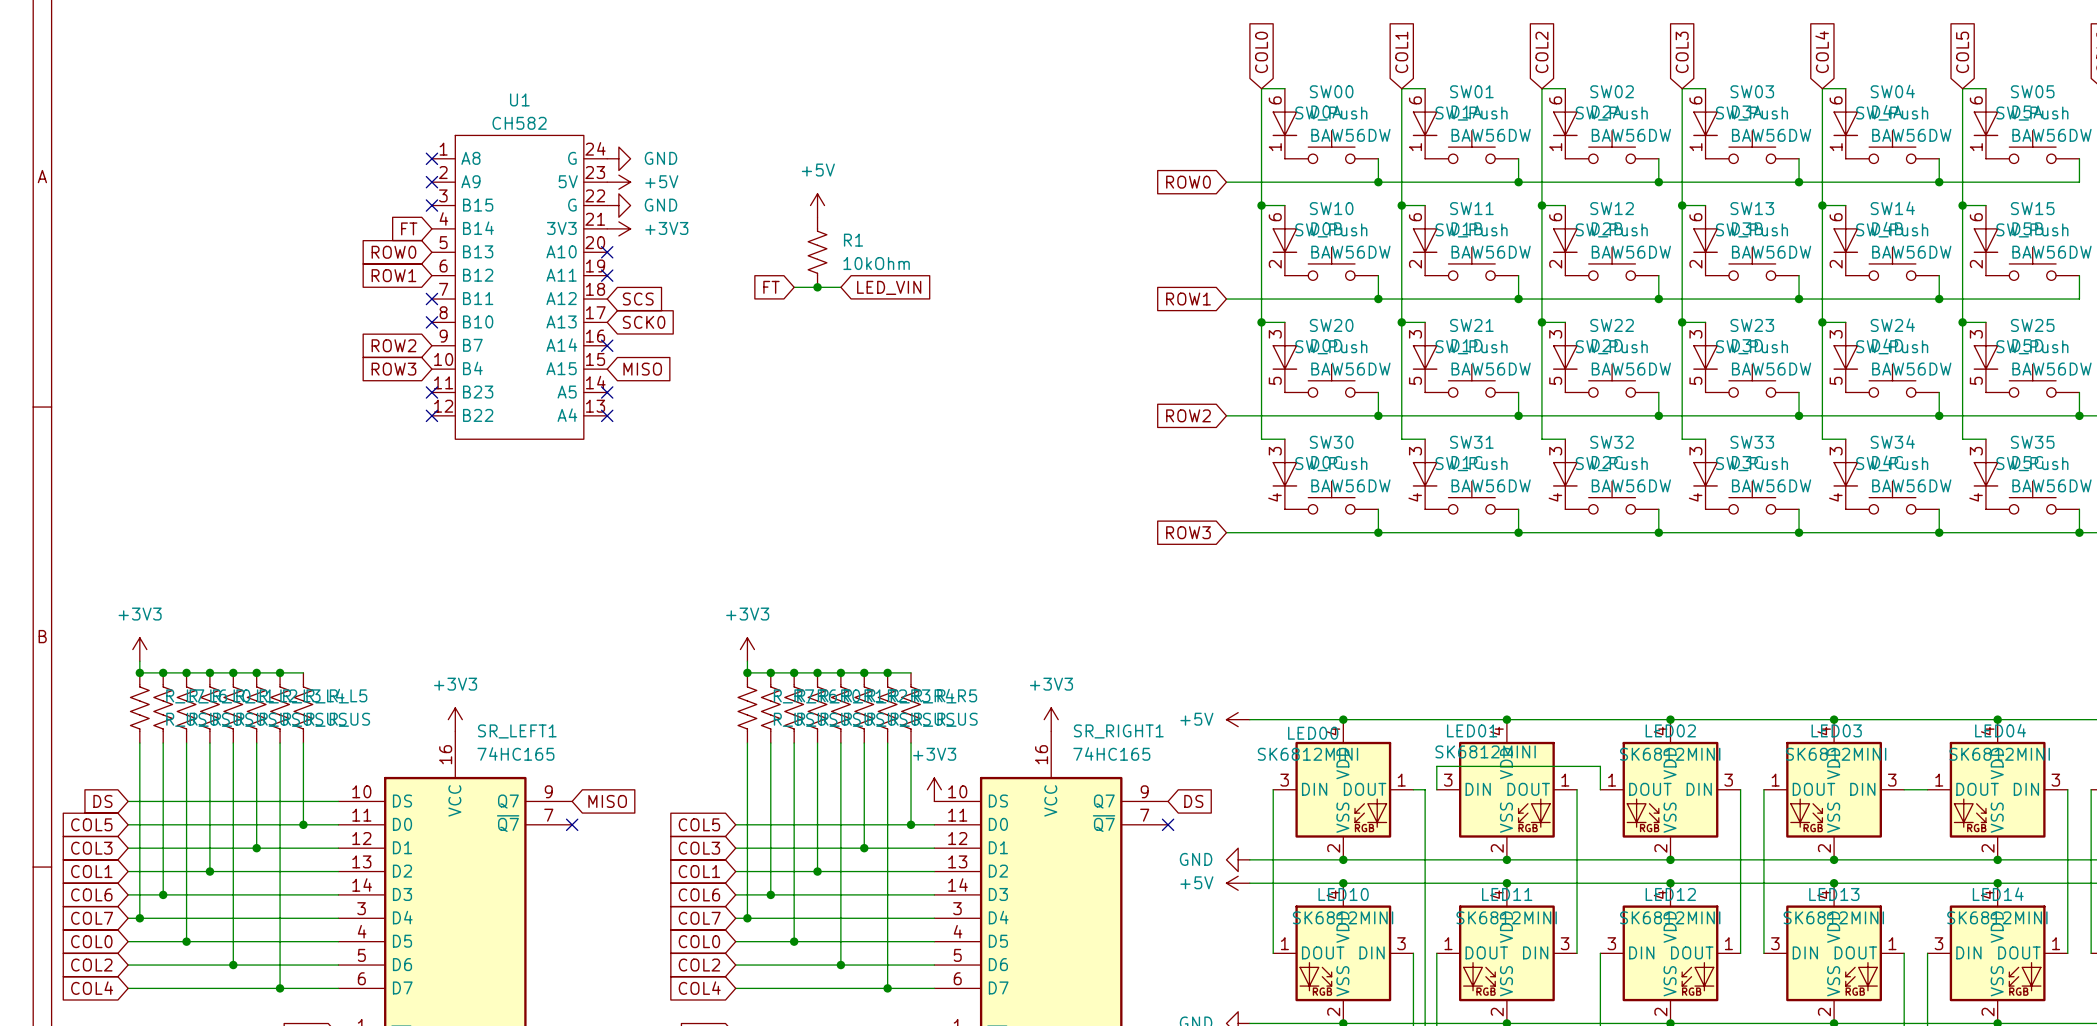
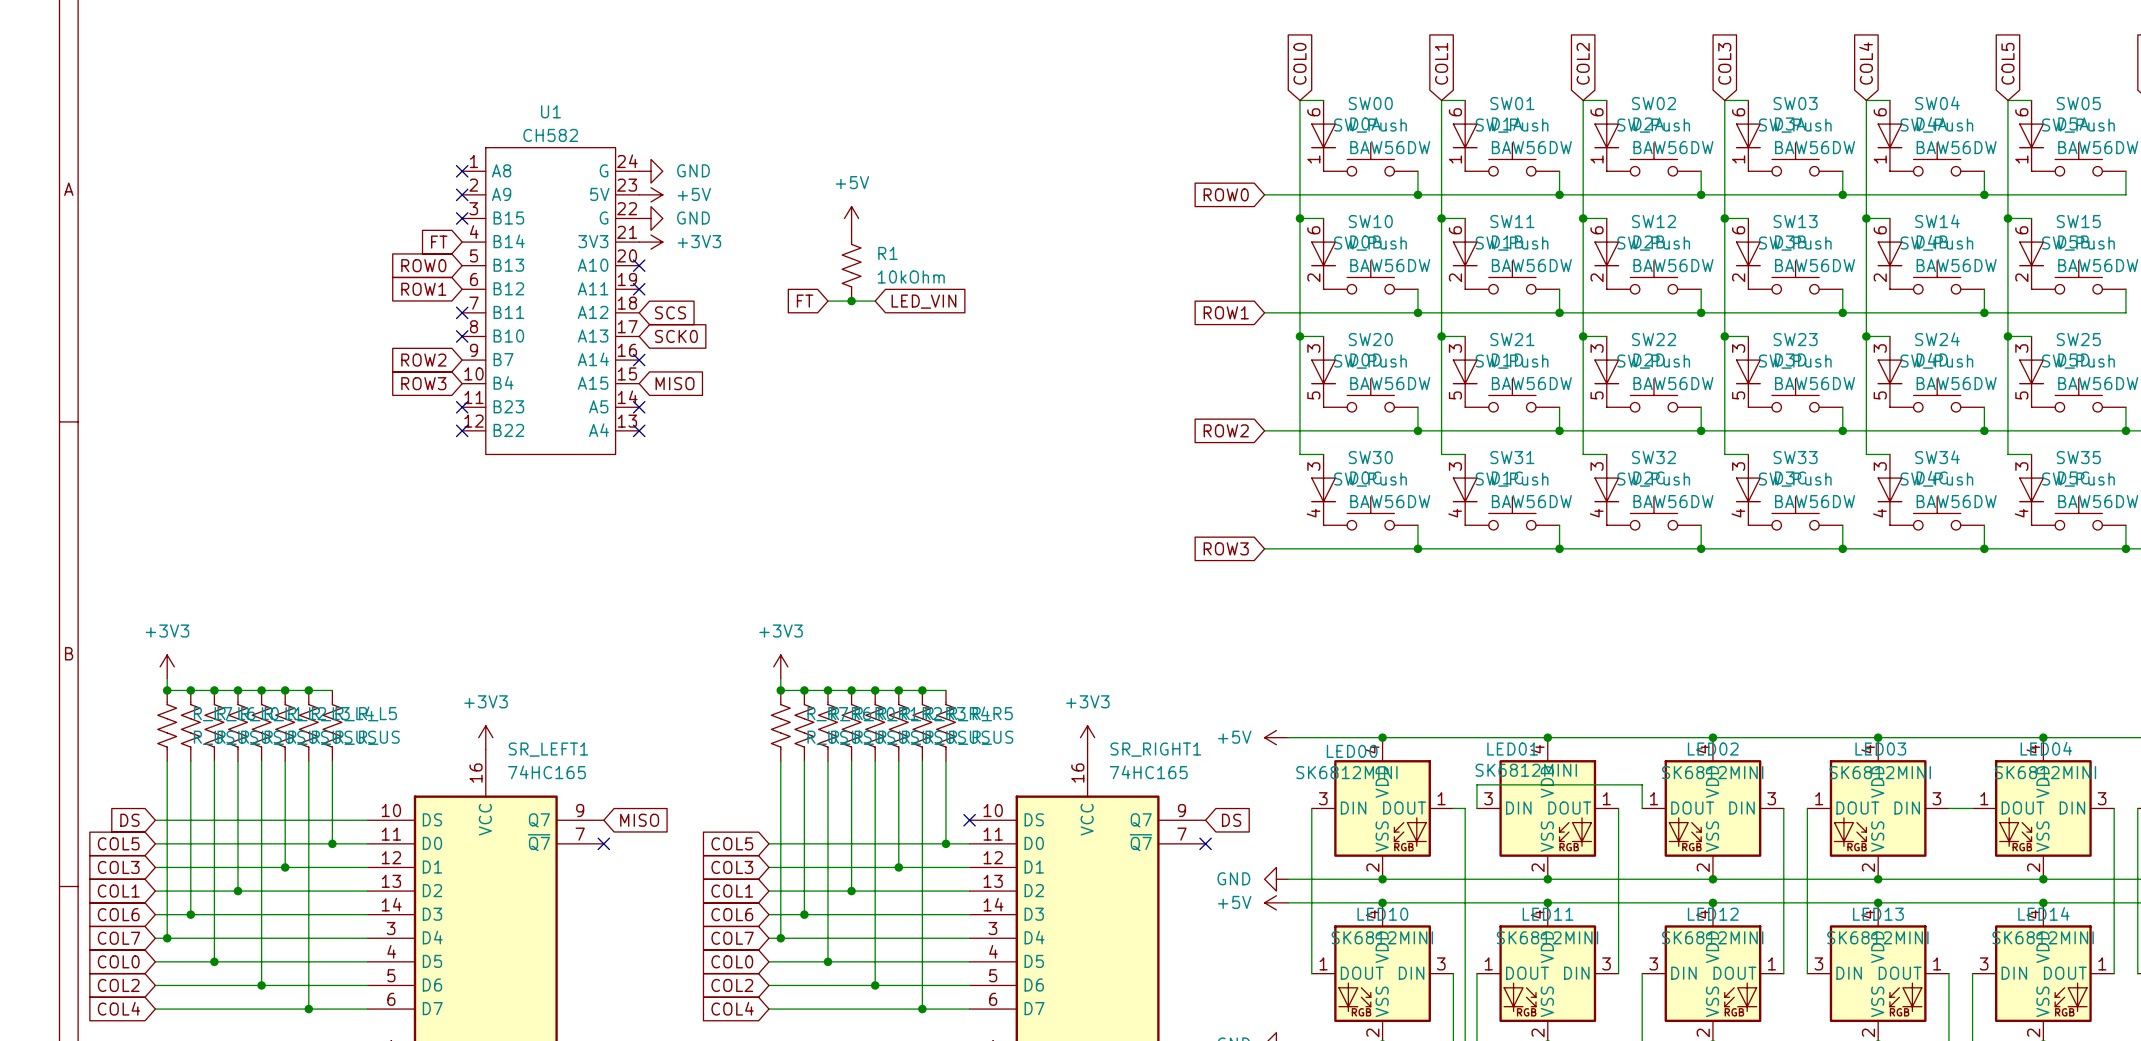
power symbol: +3V3 (934, 789) -> none
no-connect mark: none -> (969, 820)

